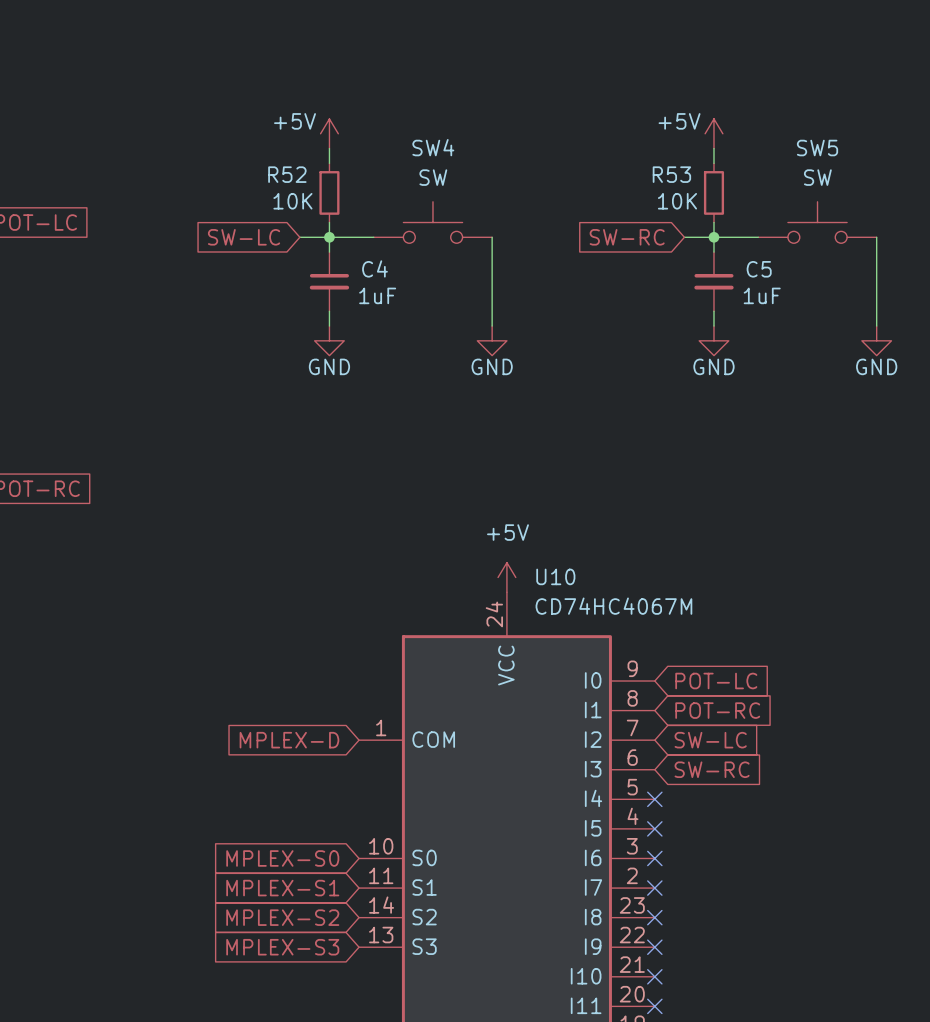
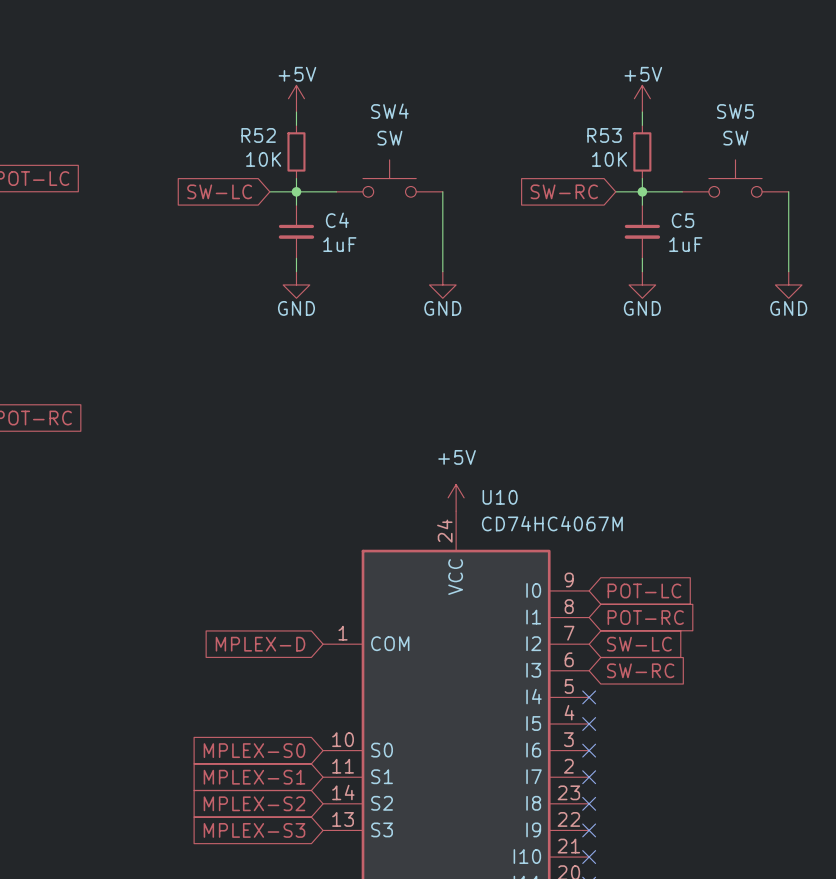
power symbol text position: +5V (295, 121) -> +5V (297, 74)
power symbol text position: +5V (679, 121) -> +5V (643, 74)

